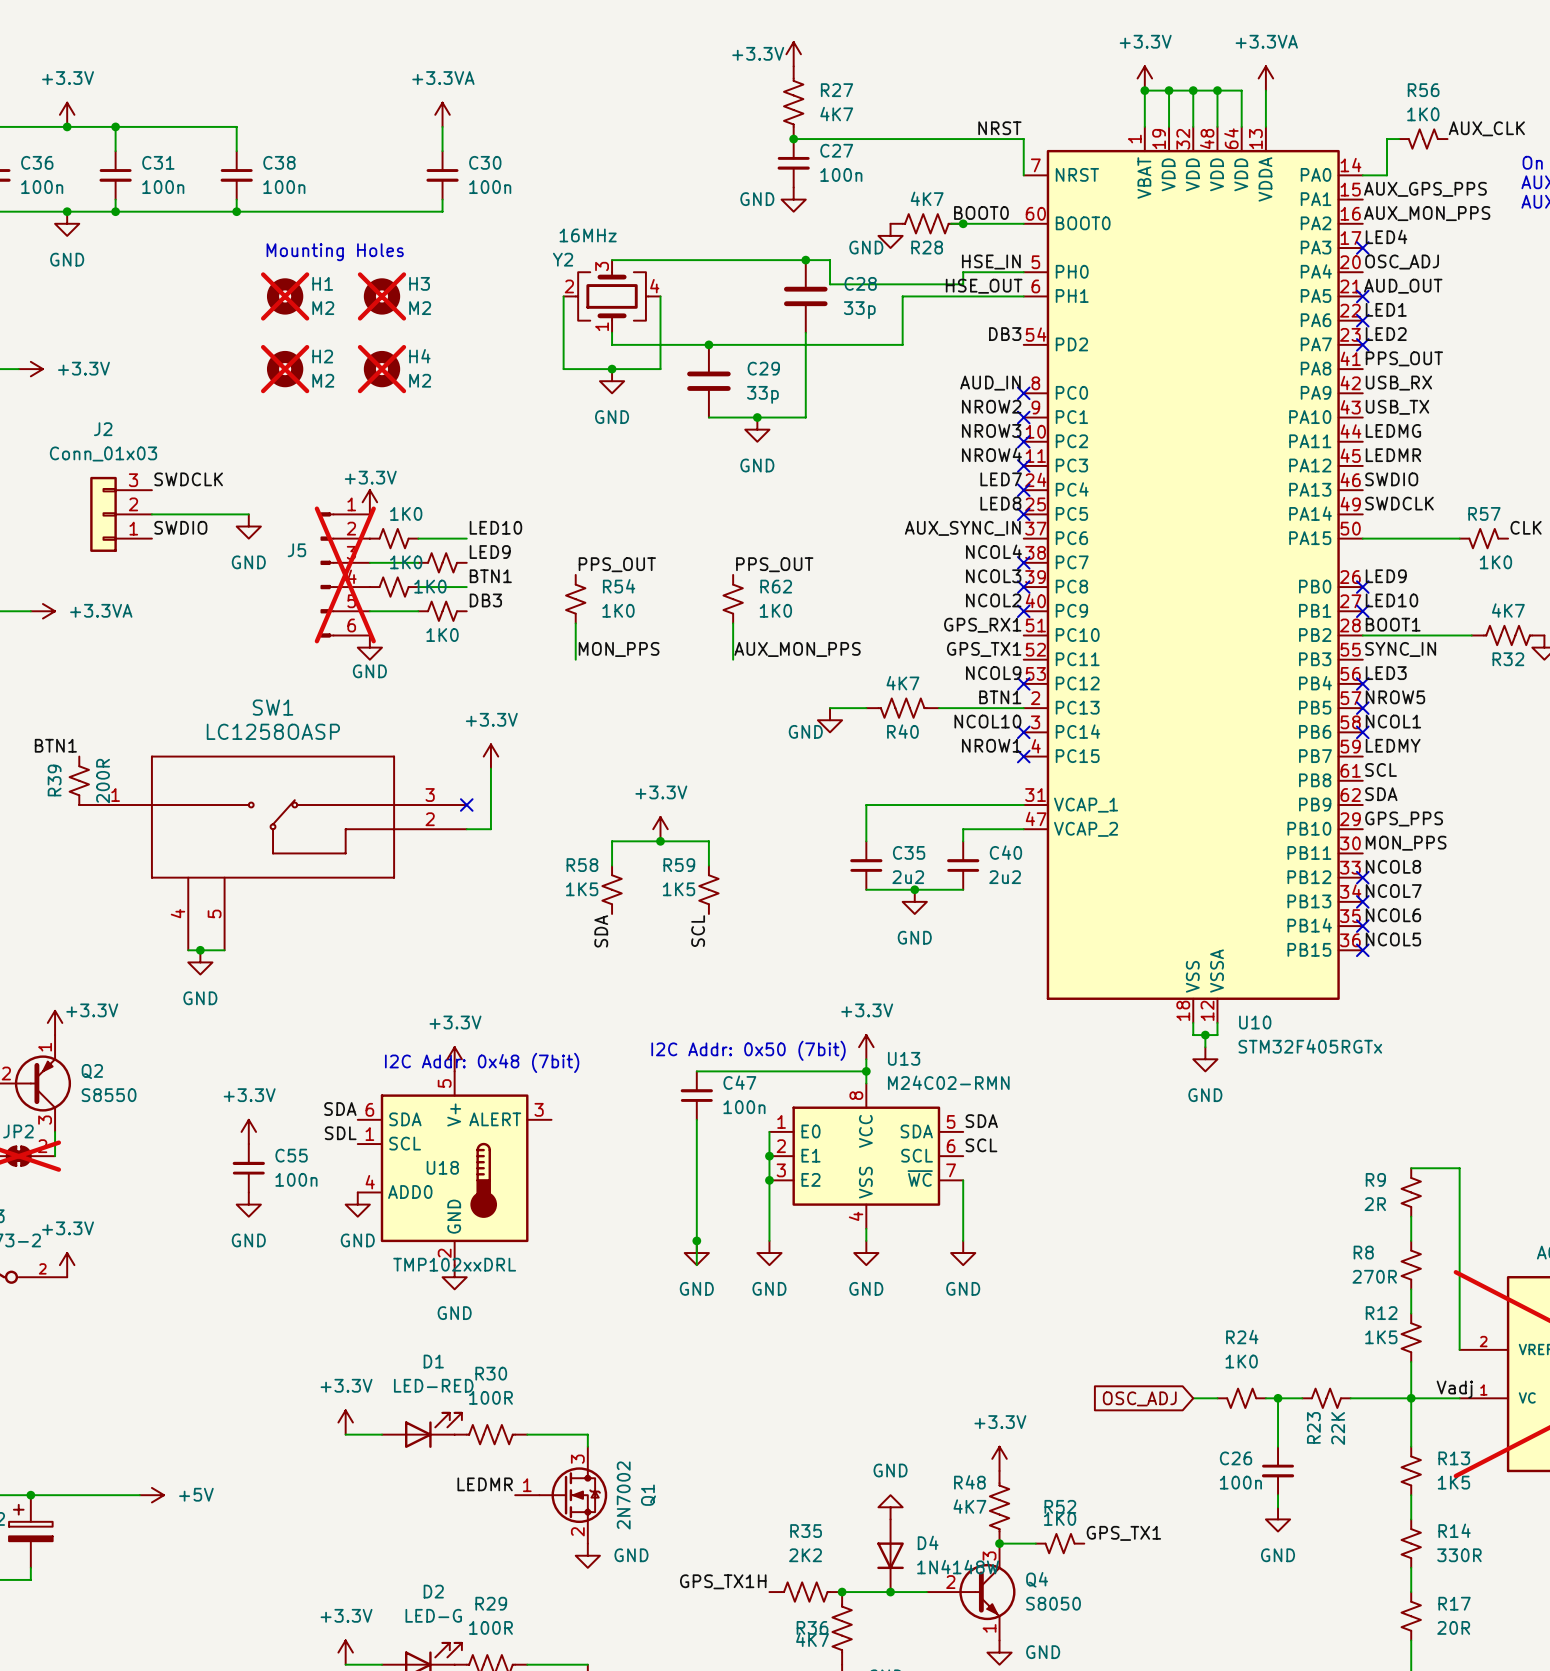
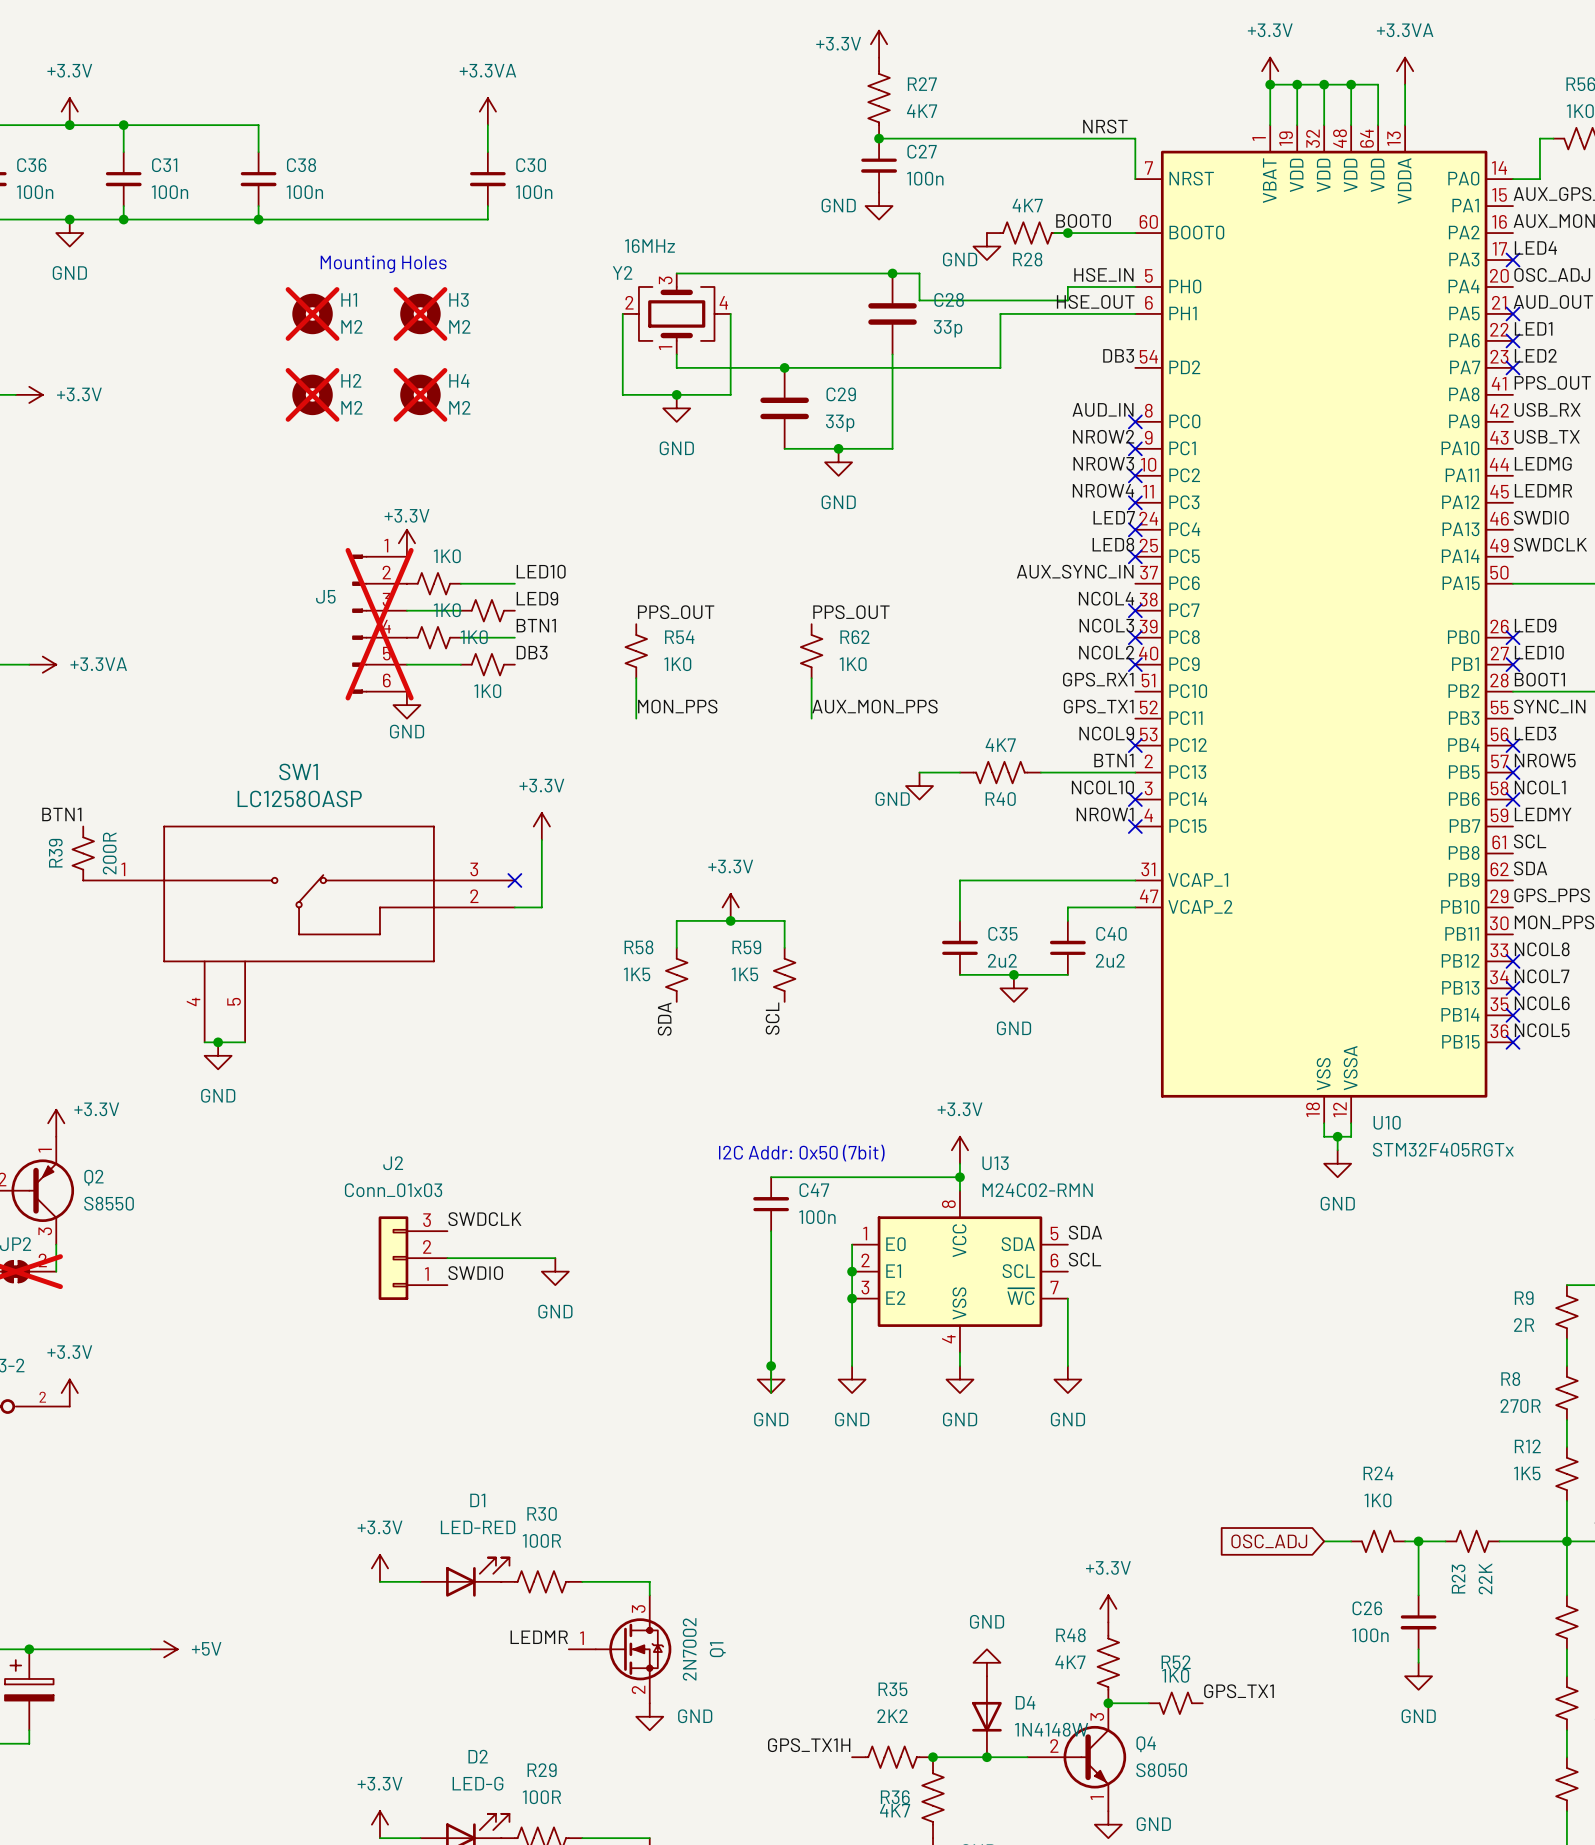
label: SWDCLK (188, 479) -> none
J2 position: (121, 514) -> (413, 1258)
wire: (151, 514) (248, 514) -> none
power symbol: GND (248, 526) -> none
label: SWDIO (180, 527) -> none
power symbol: +3.3V (454, 1059) -> none
text: I2C Addr: 0x48 (7bit) (482, 1062) -> none
label: SDA (340, 1109) -> none
label: none -> SWDCLK (484, 1219)
power symbol: +3.3V (248, 1131) -> none
label: SDL (340, 1133) -> none
power symbol: none -> GND (555, 1271)
label: none -> SWDIO (475, 1273)
C55: 100n (248, 1168) -> none
U18: TMP102xxDRL (454, 1168) -> none
power symbol: GND (248, 1204) -> none
power symbol: GND (357, 1204) -> none
power symbol: GND (454, 1277) -> none

